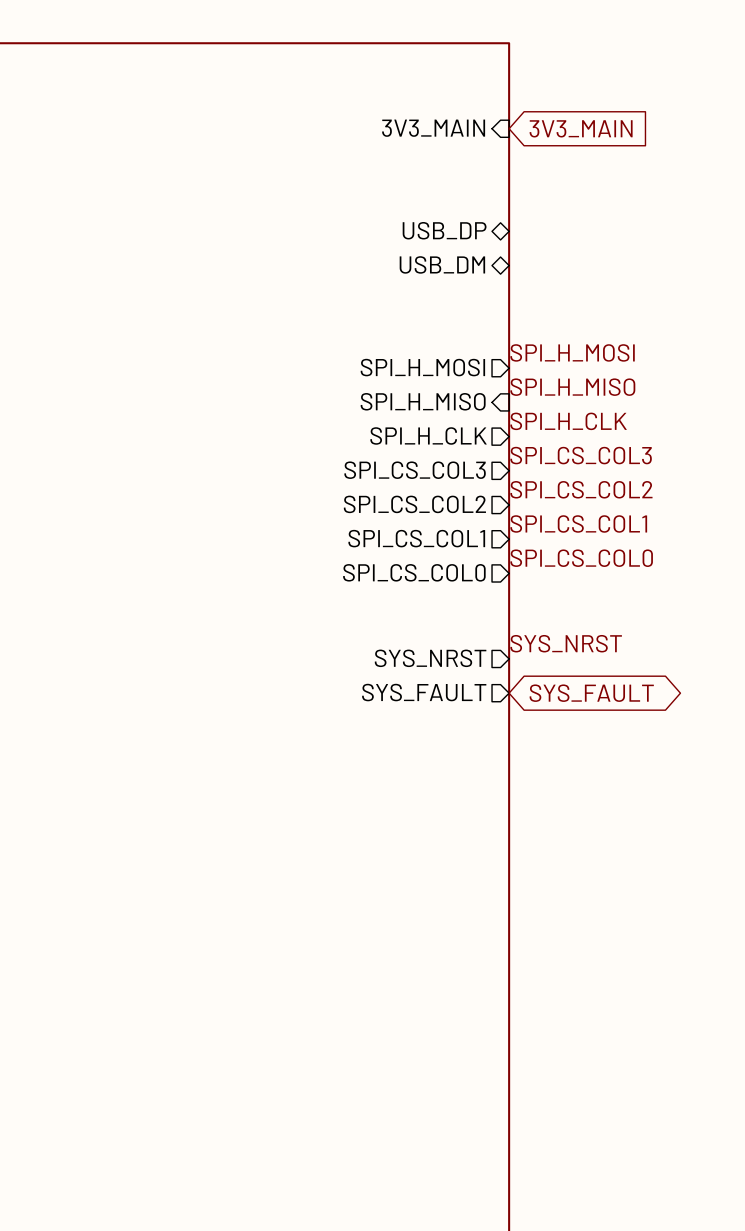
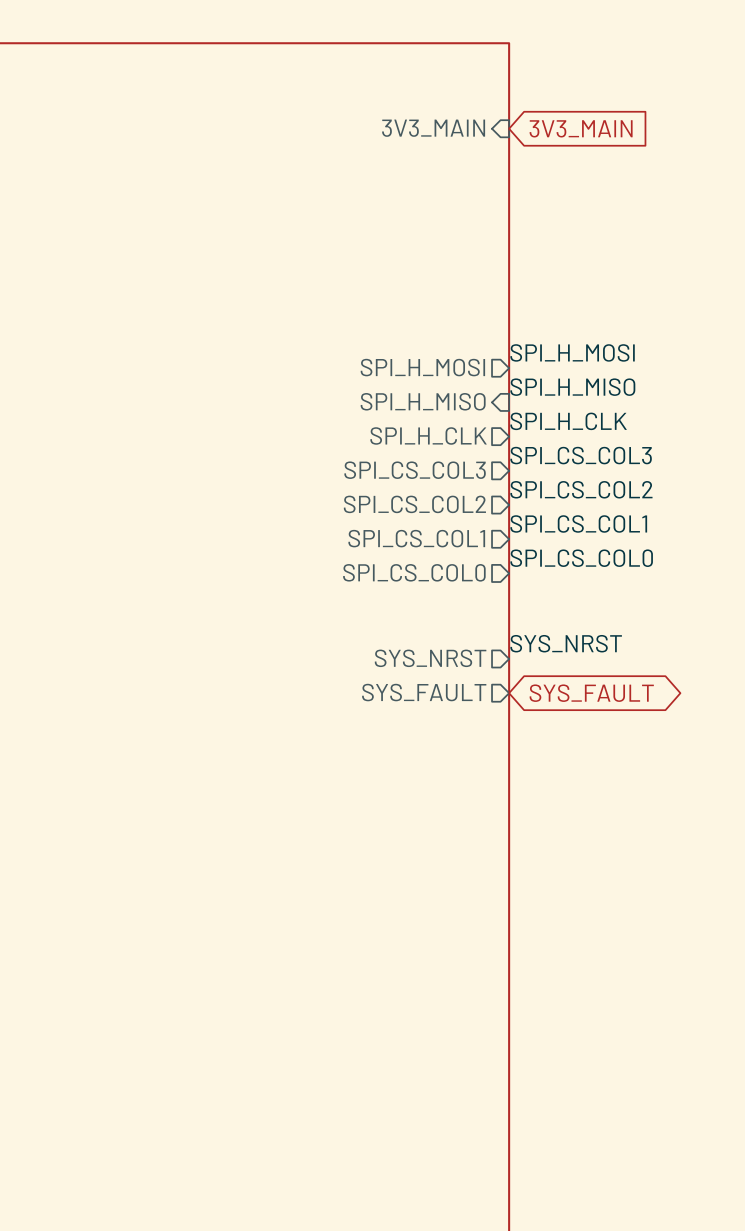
sheet pin: USB_DP (444, 230) -> none
sheet pin: USB_DM (442, 264) -> none

